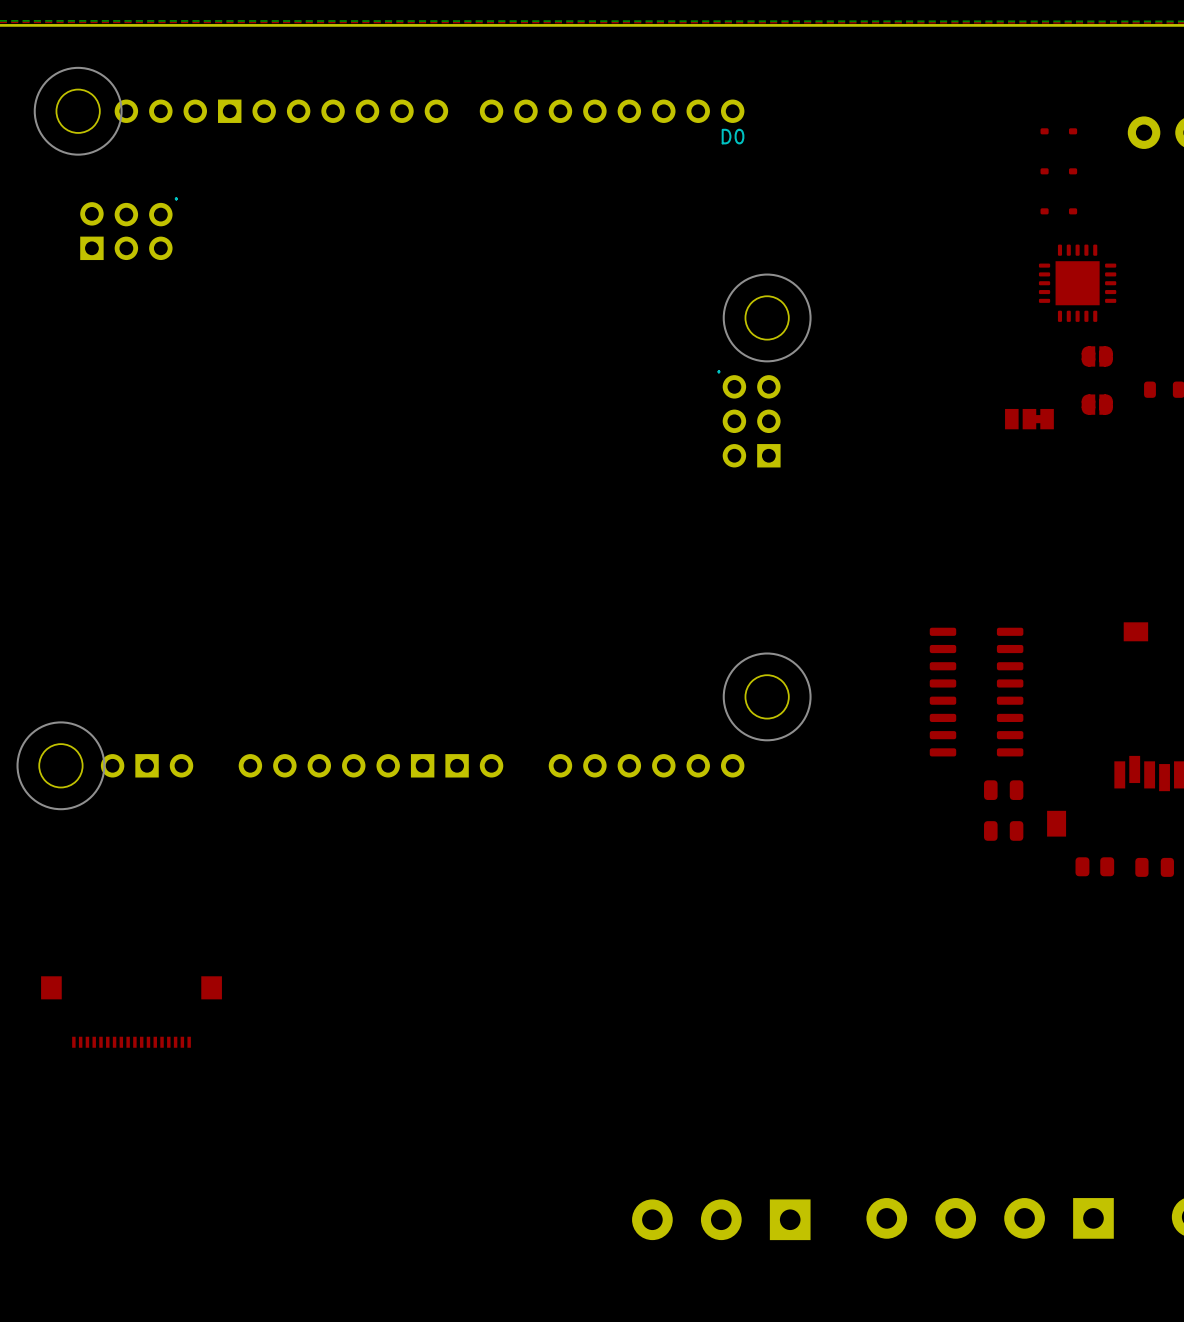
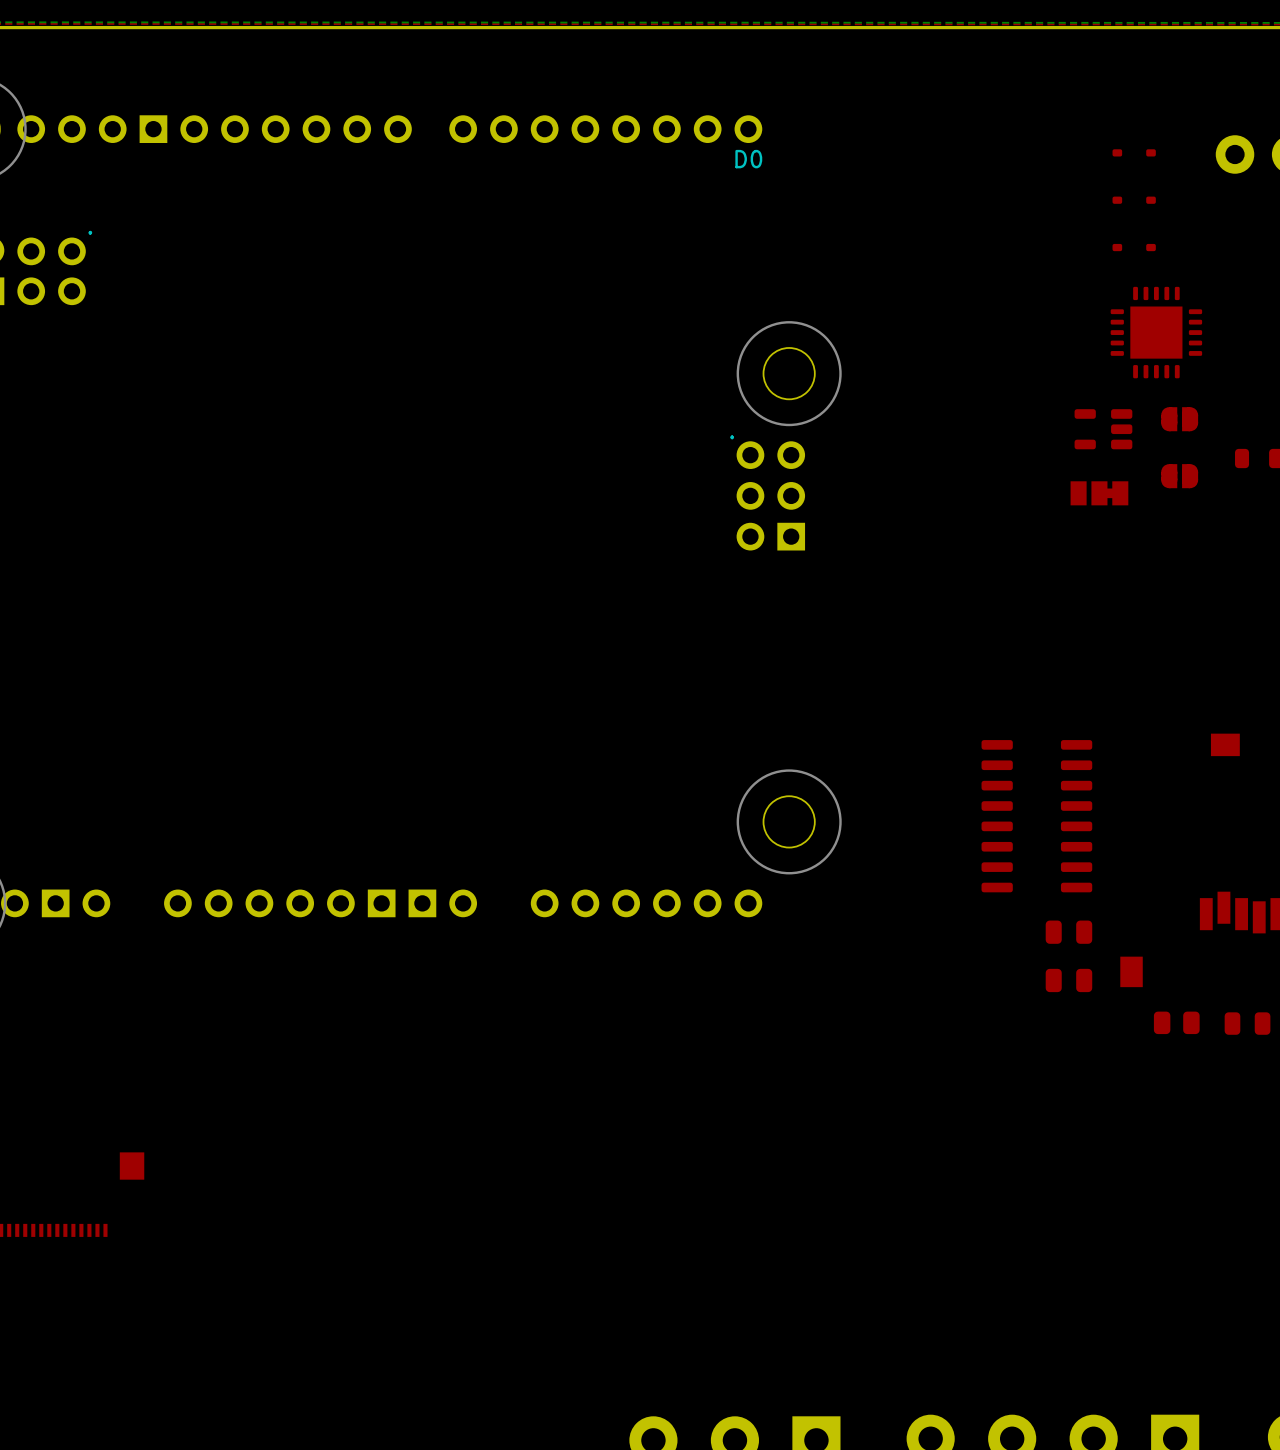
part: none -> (1103, 429)

